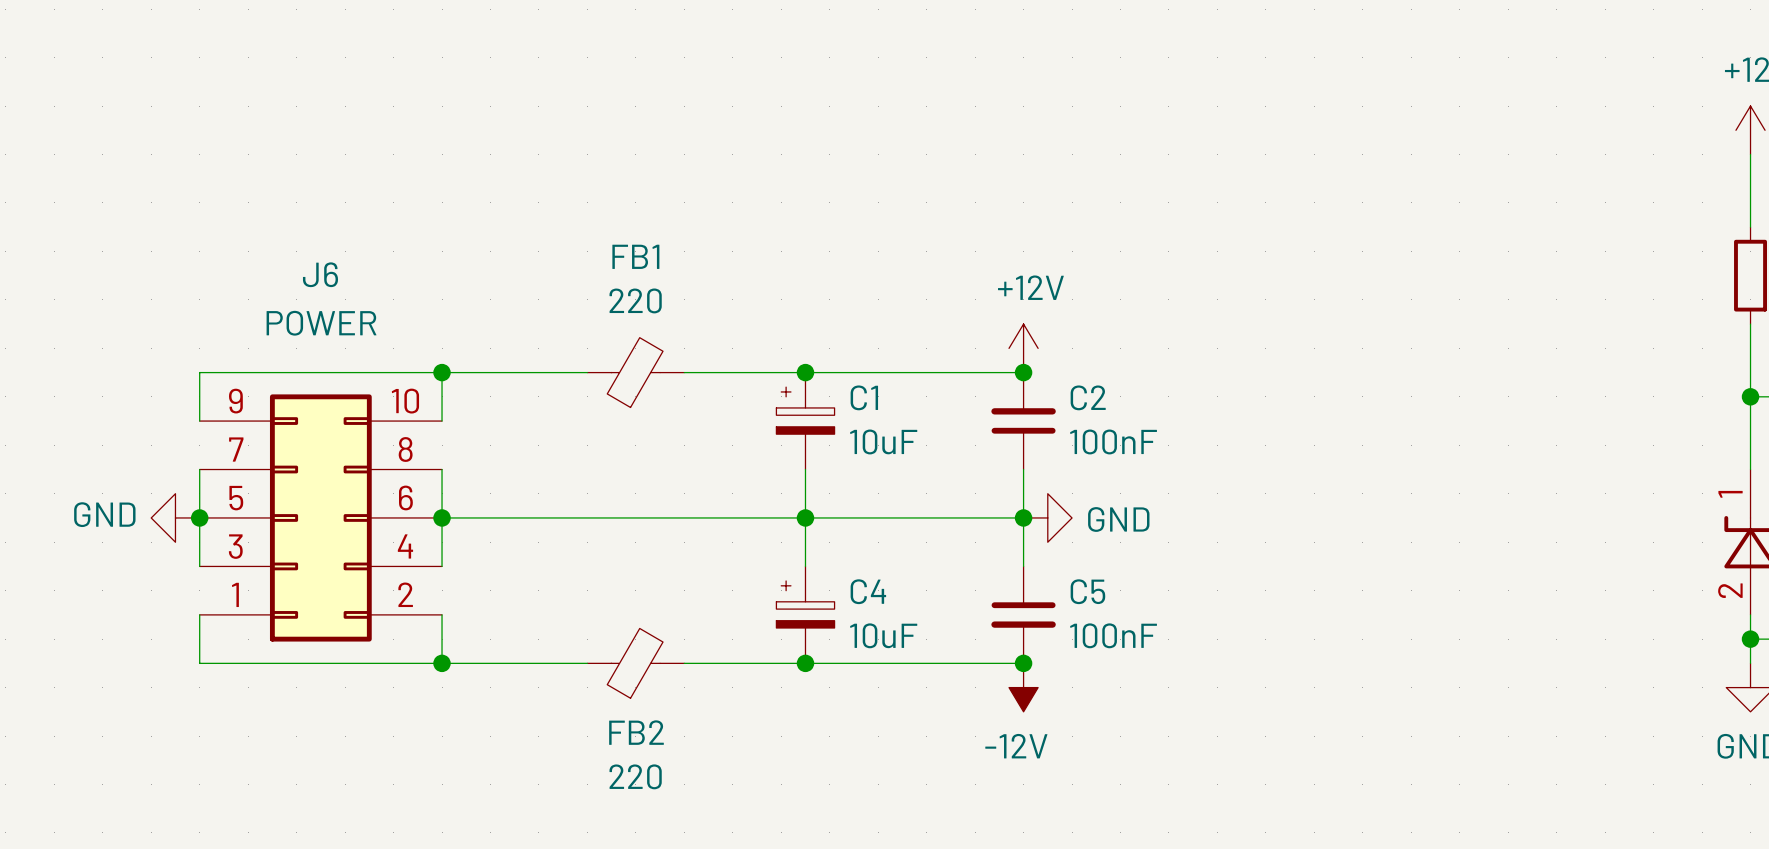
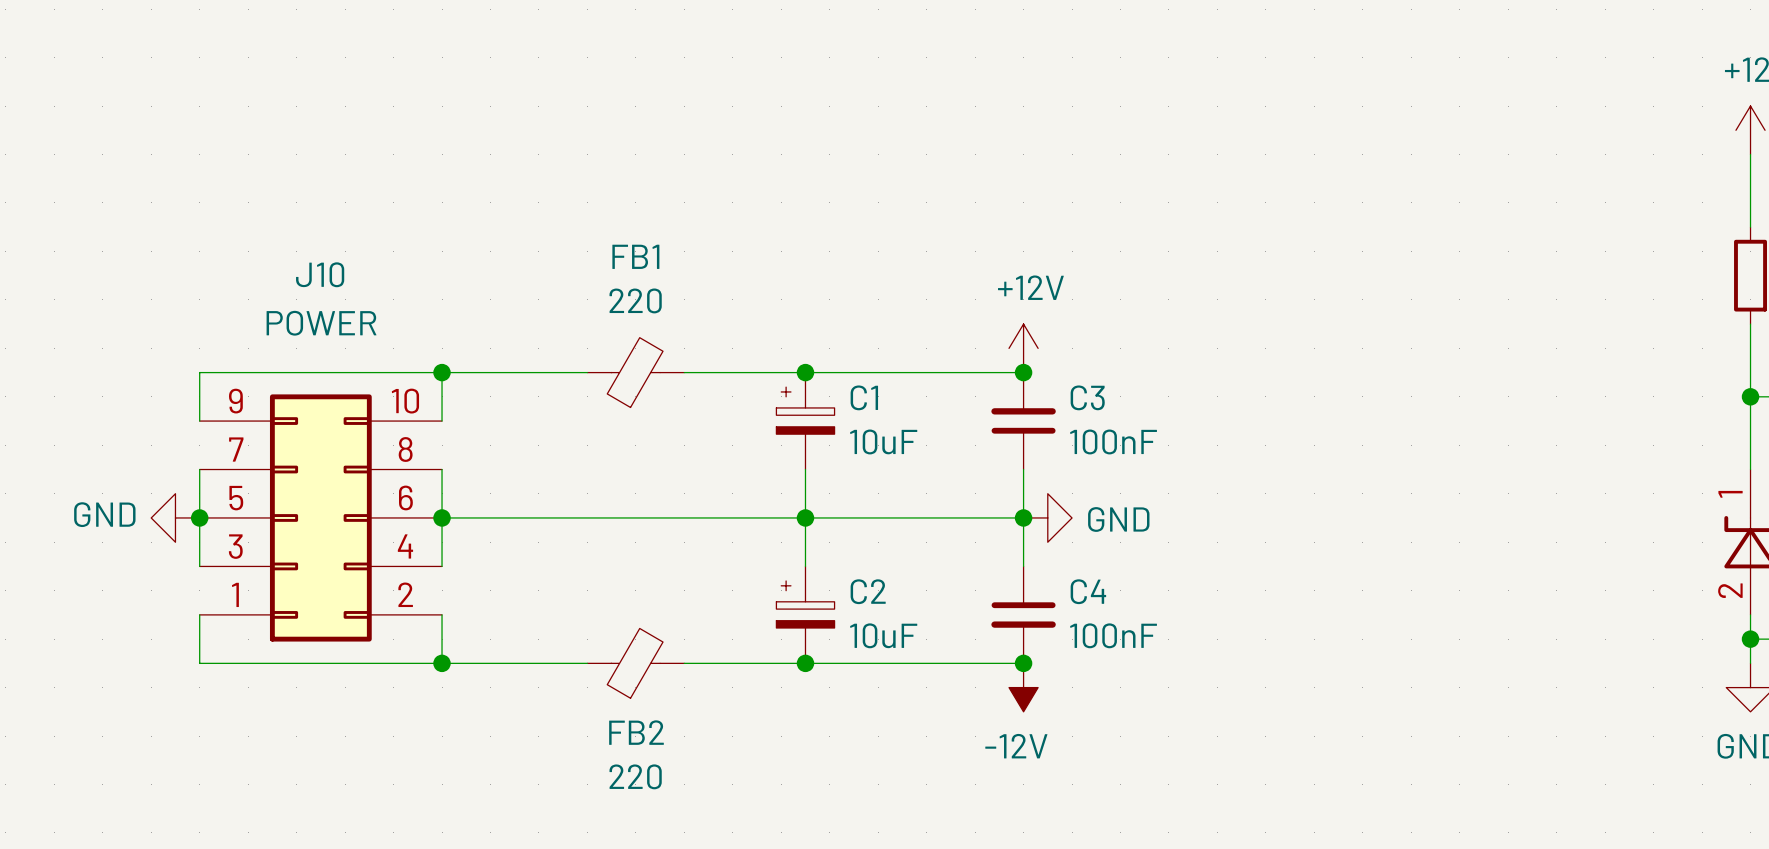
J6 name: J6 (320, 274) -> J10 (320, 274)
C2 name: C2 (1088, 397) -> C3 (1087, 397)
C4 name: C4 (868, 591) -> C2 (868, 591)
C5 name: C5 (1087, 591) -> C4 (1088, 591)

